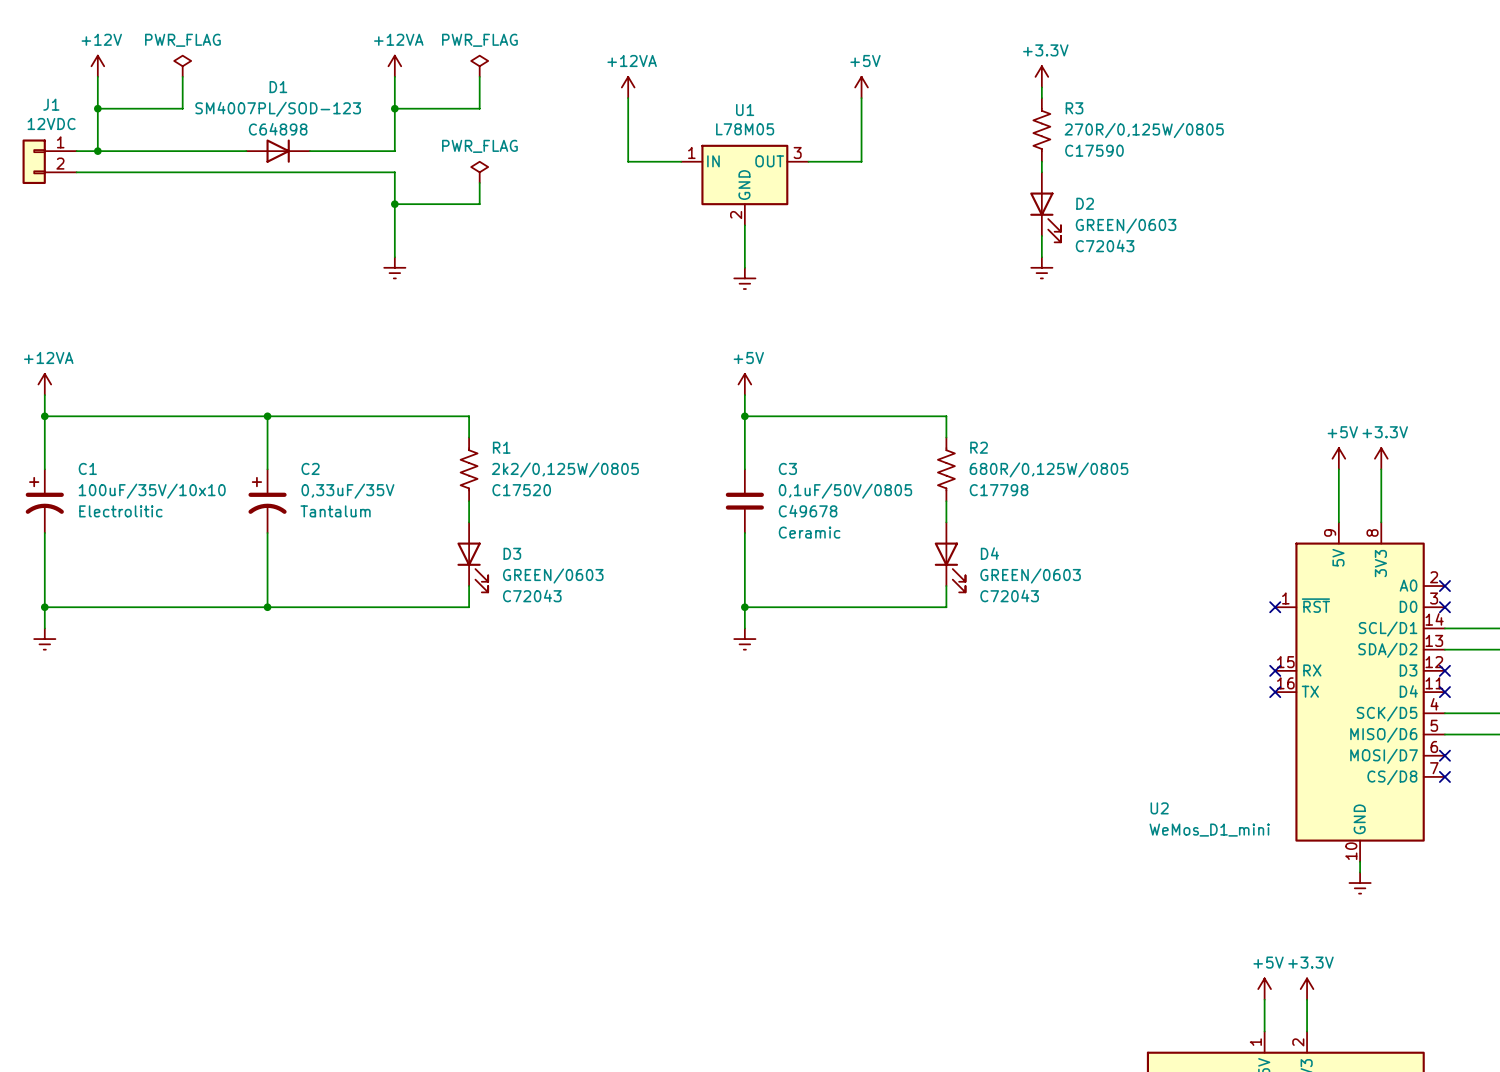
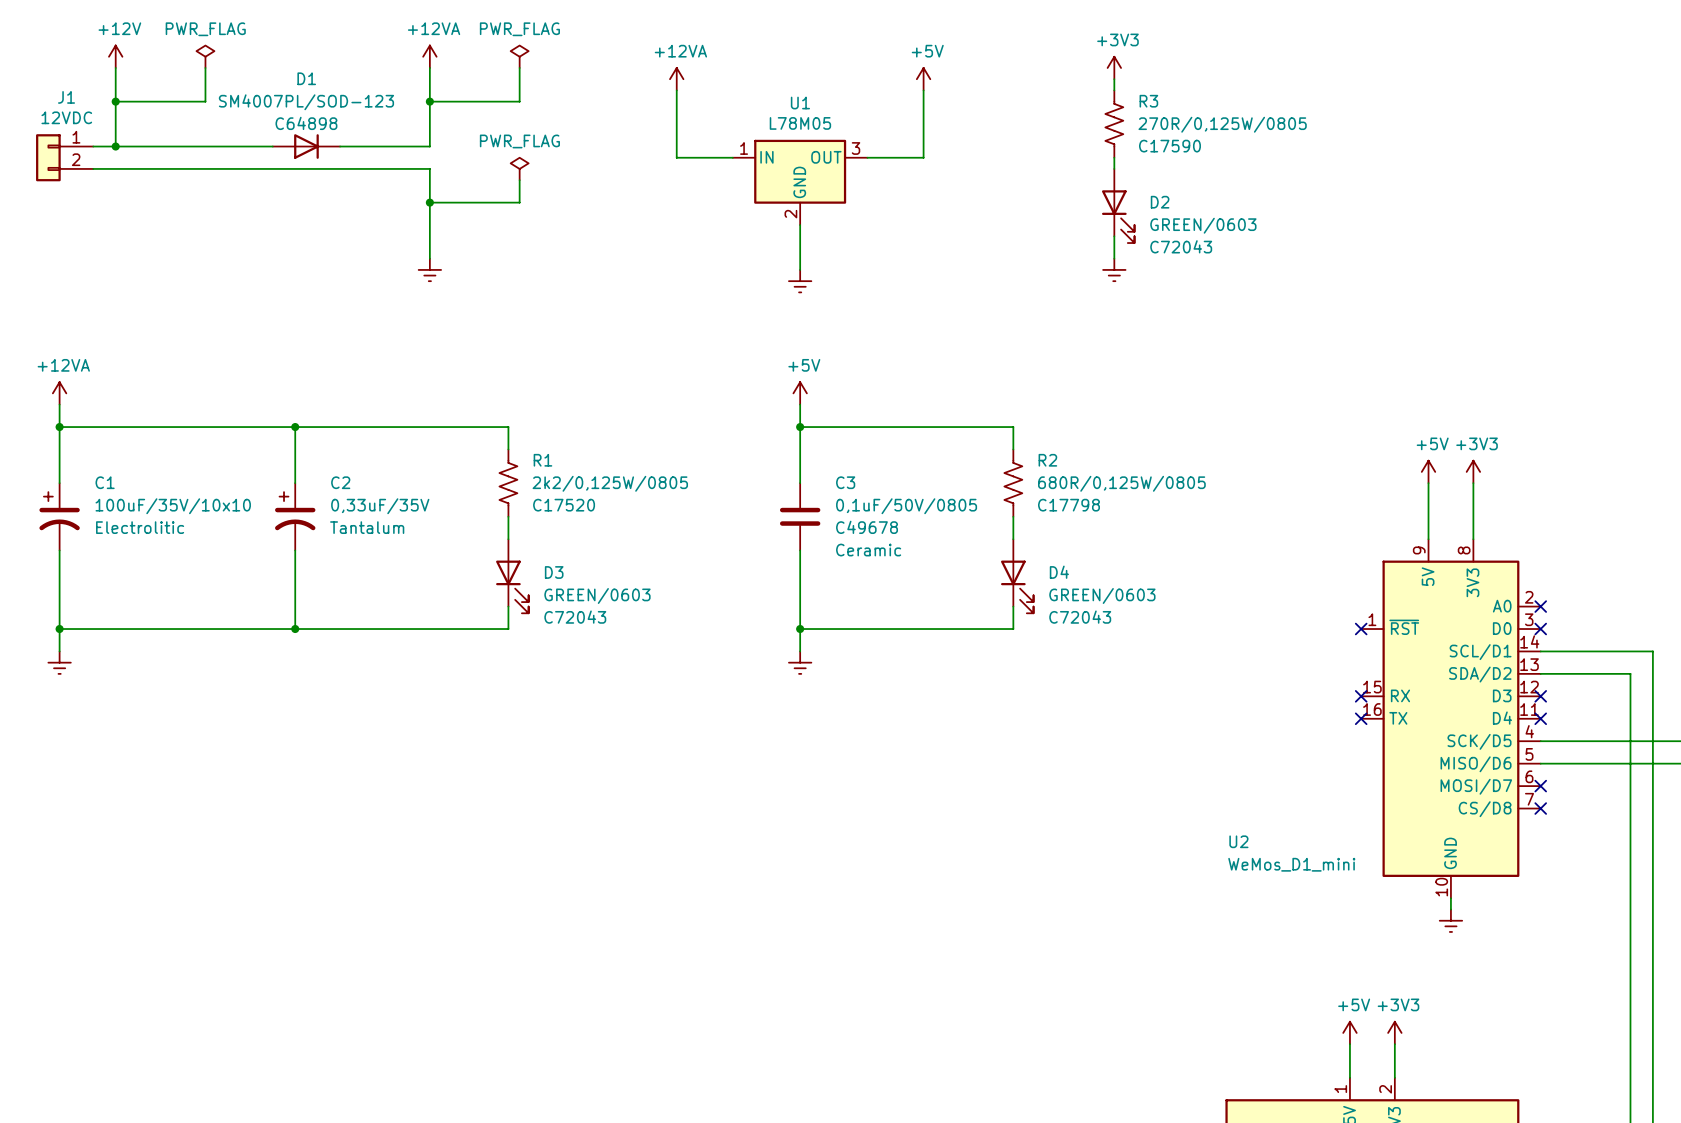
power symbol: +3.3V (1041, 76) -> +3V3 (1114, 67)
power symbol: +3.3V (1381, 458) -> +3V3 (1473, 471)
power symbol: +3.3V (1307, 989) -> +3V3 (1394, 1032)

